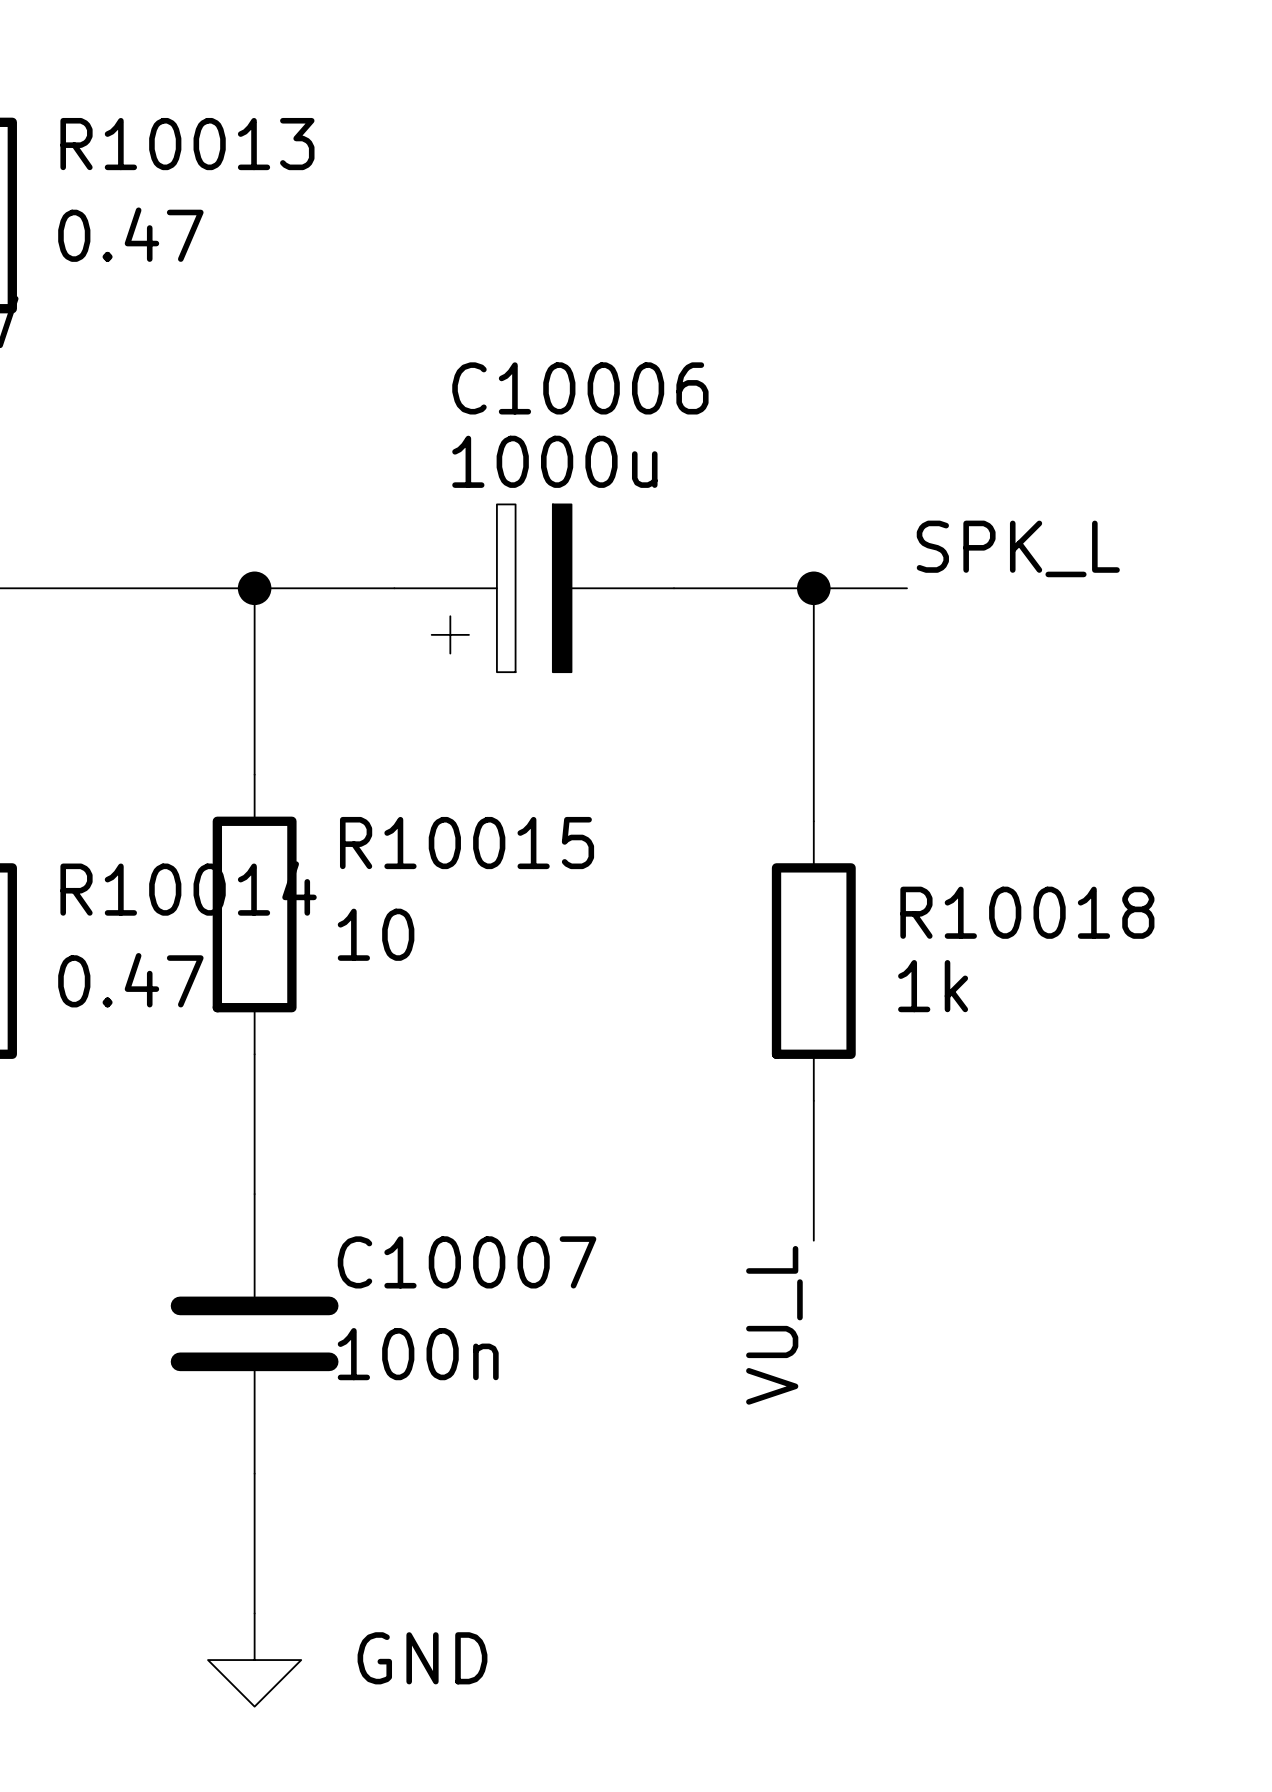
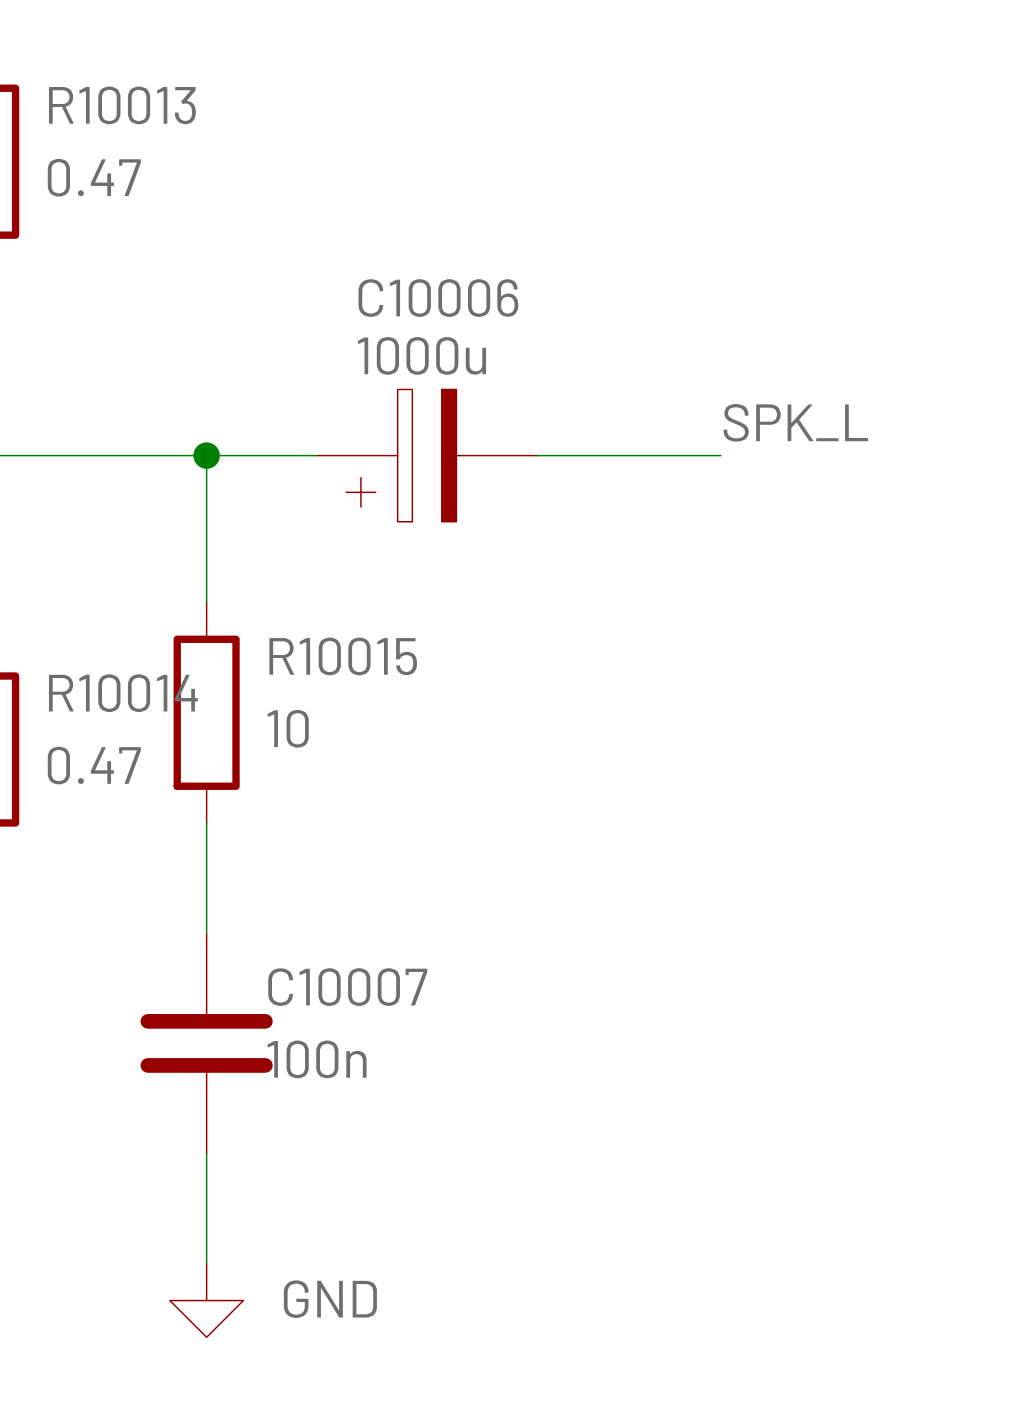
wire: (813, 588) (813, 821) -> none
junction: (813, 588) -> none
R10018: 1k (813, 961) -> none
wire: (813, 1100) (813, 1240) -> none
label: VU_L (774, 1325) -> none

